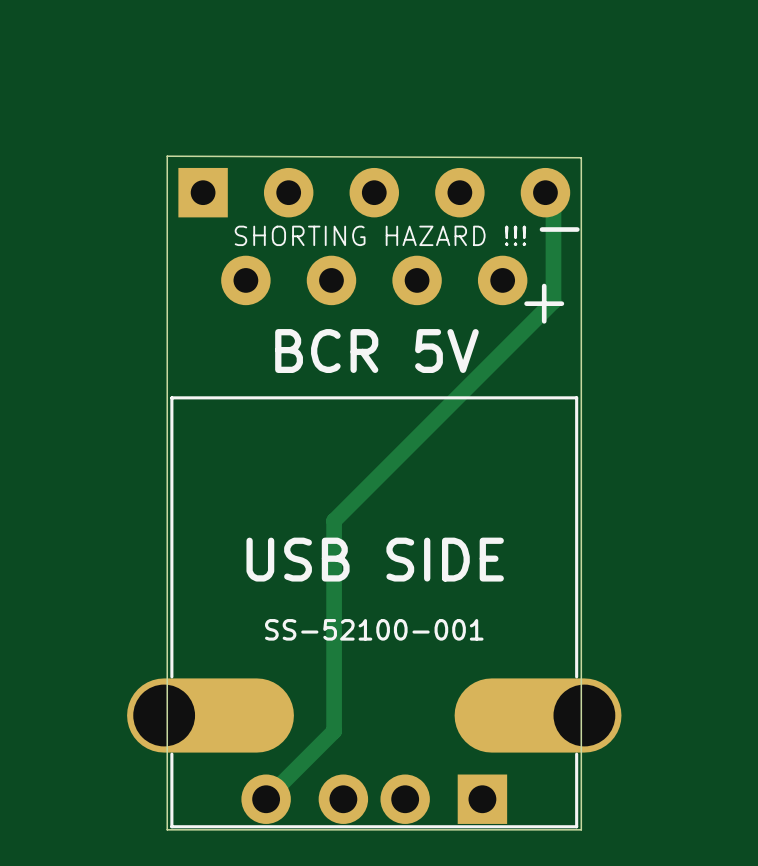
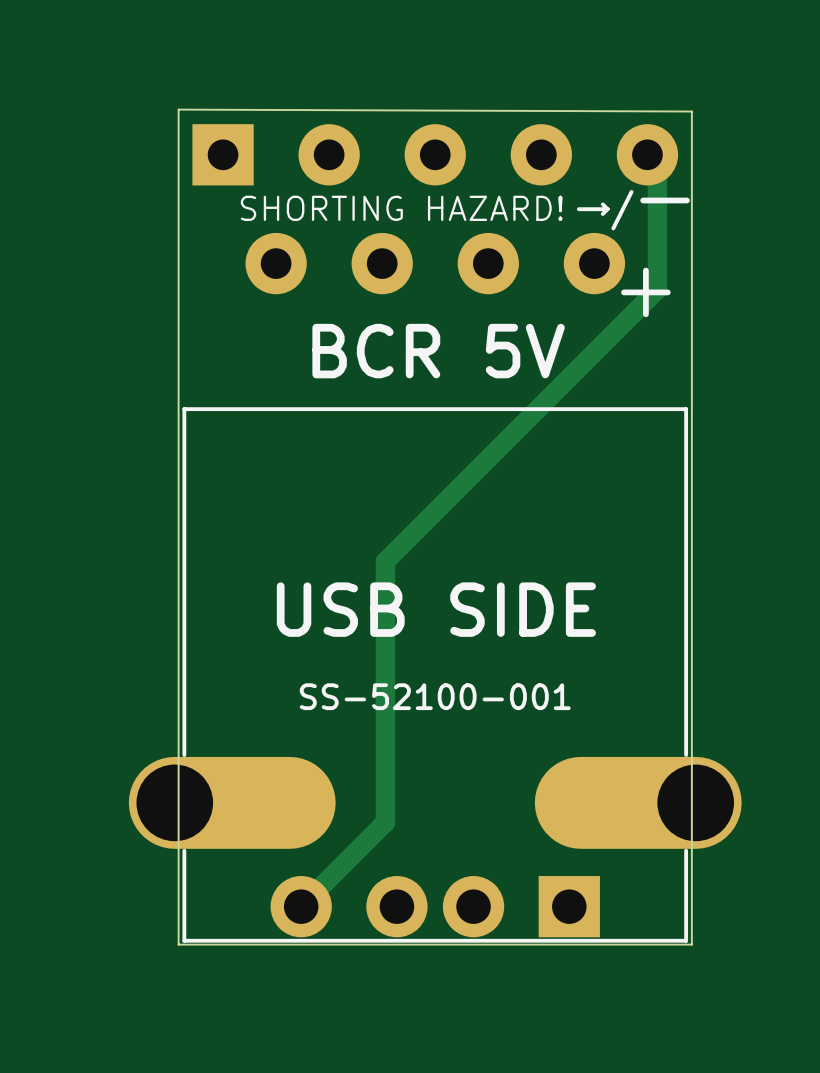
line: none -> (631, 191) (613, 228)
line: none -> (602, 204) (607, 209)
text: SHORTING HAZARD !!! (380, 235) -> SHORTING HAZARD! (401, 208)
line: none -> (578, 209) (607, 209)
line: none -> (607, 209) (602, 213)

